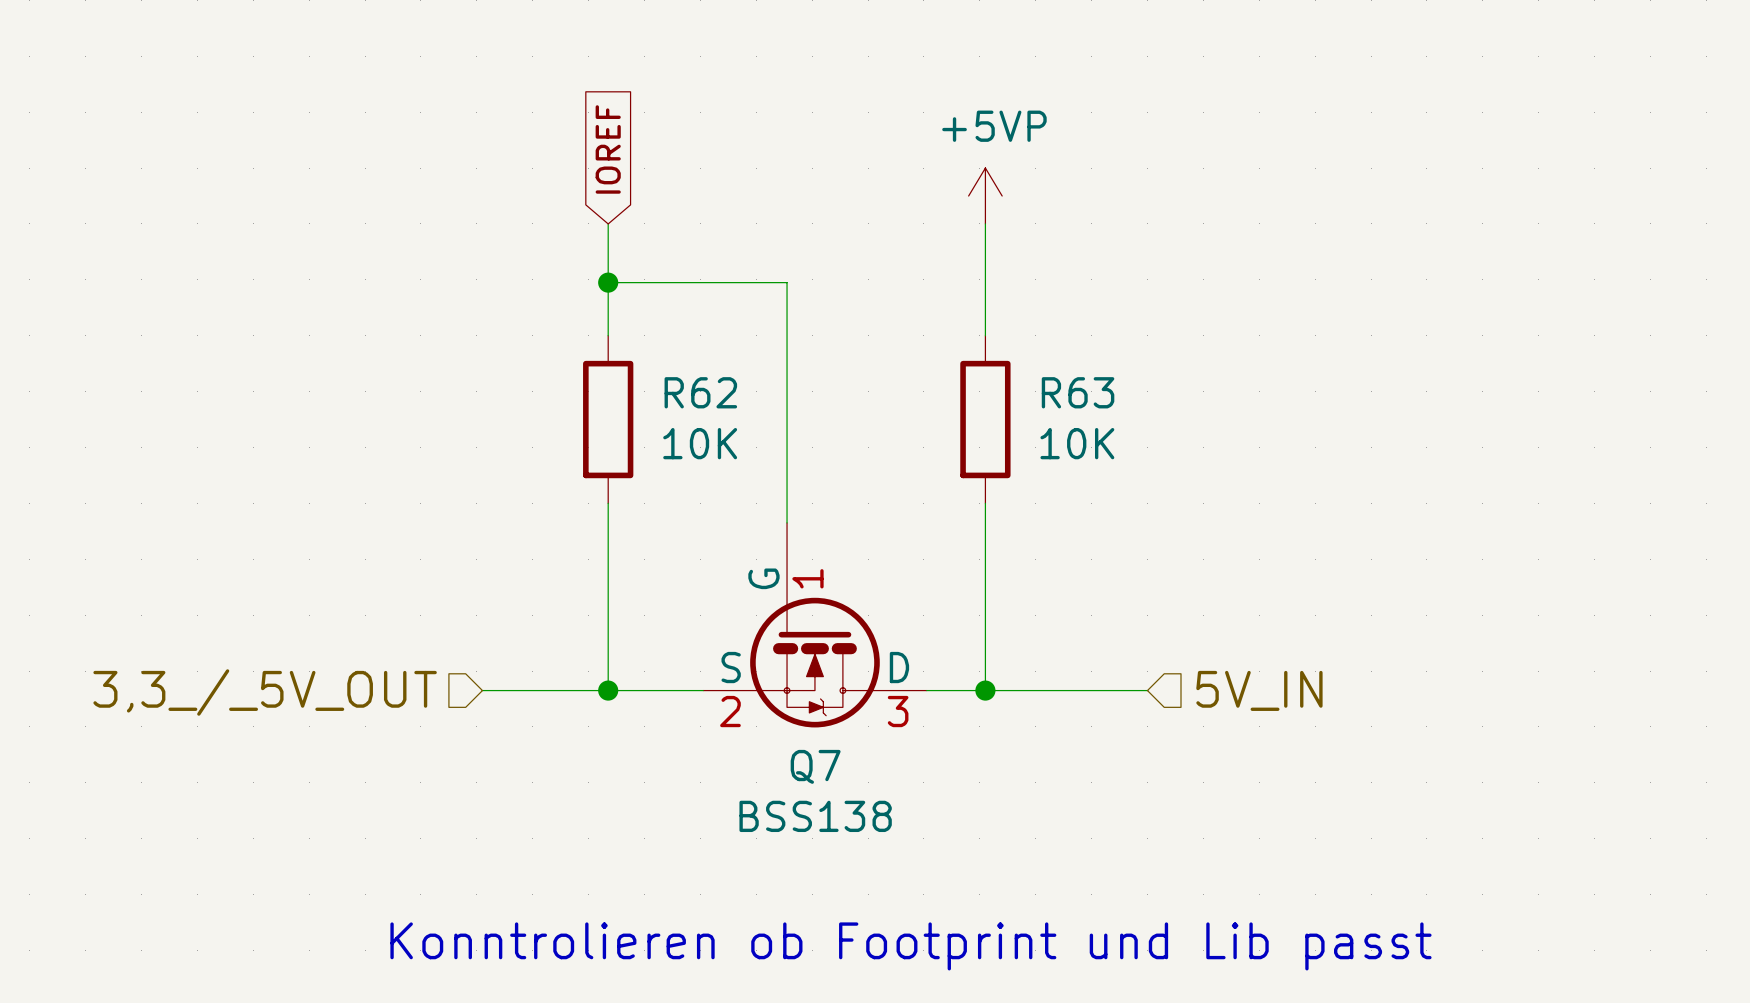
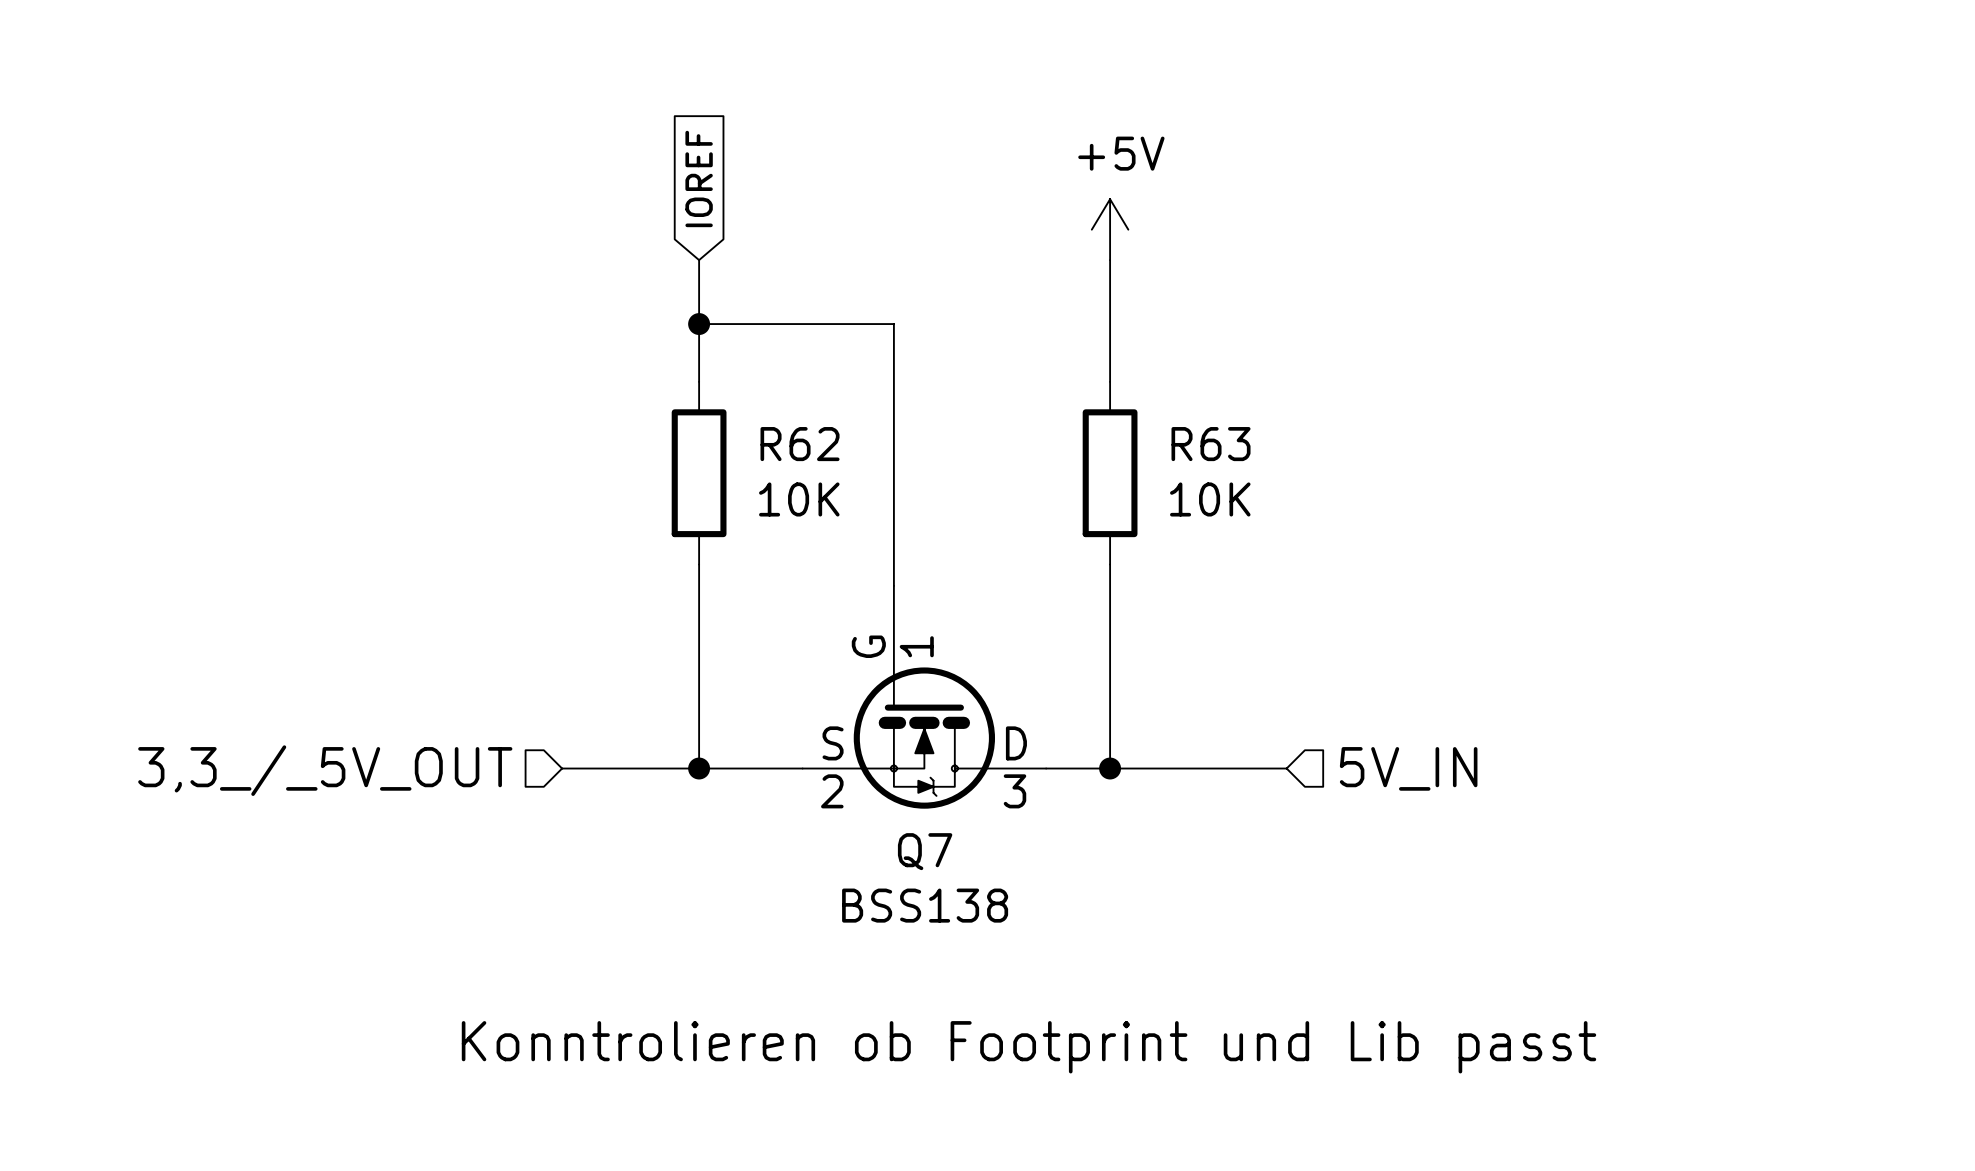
power symbol: +5VP (985, 196) -> +5V (1110, 229)

